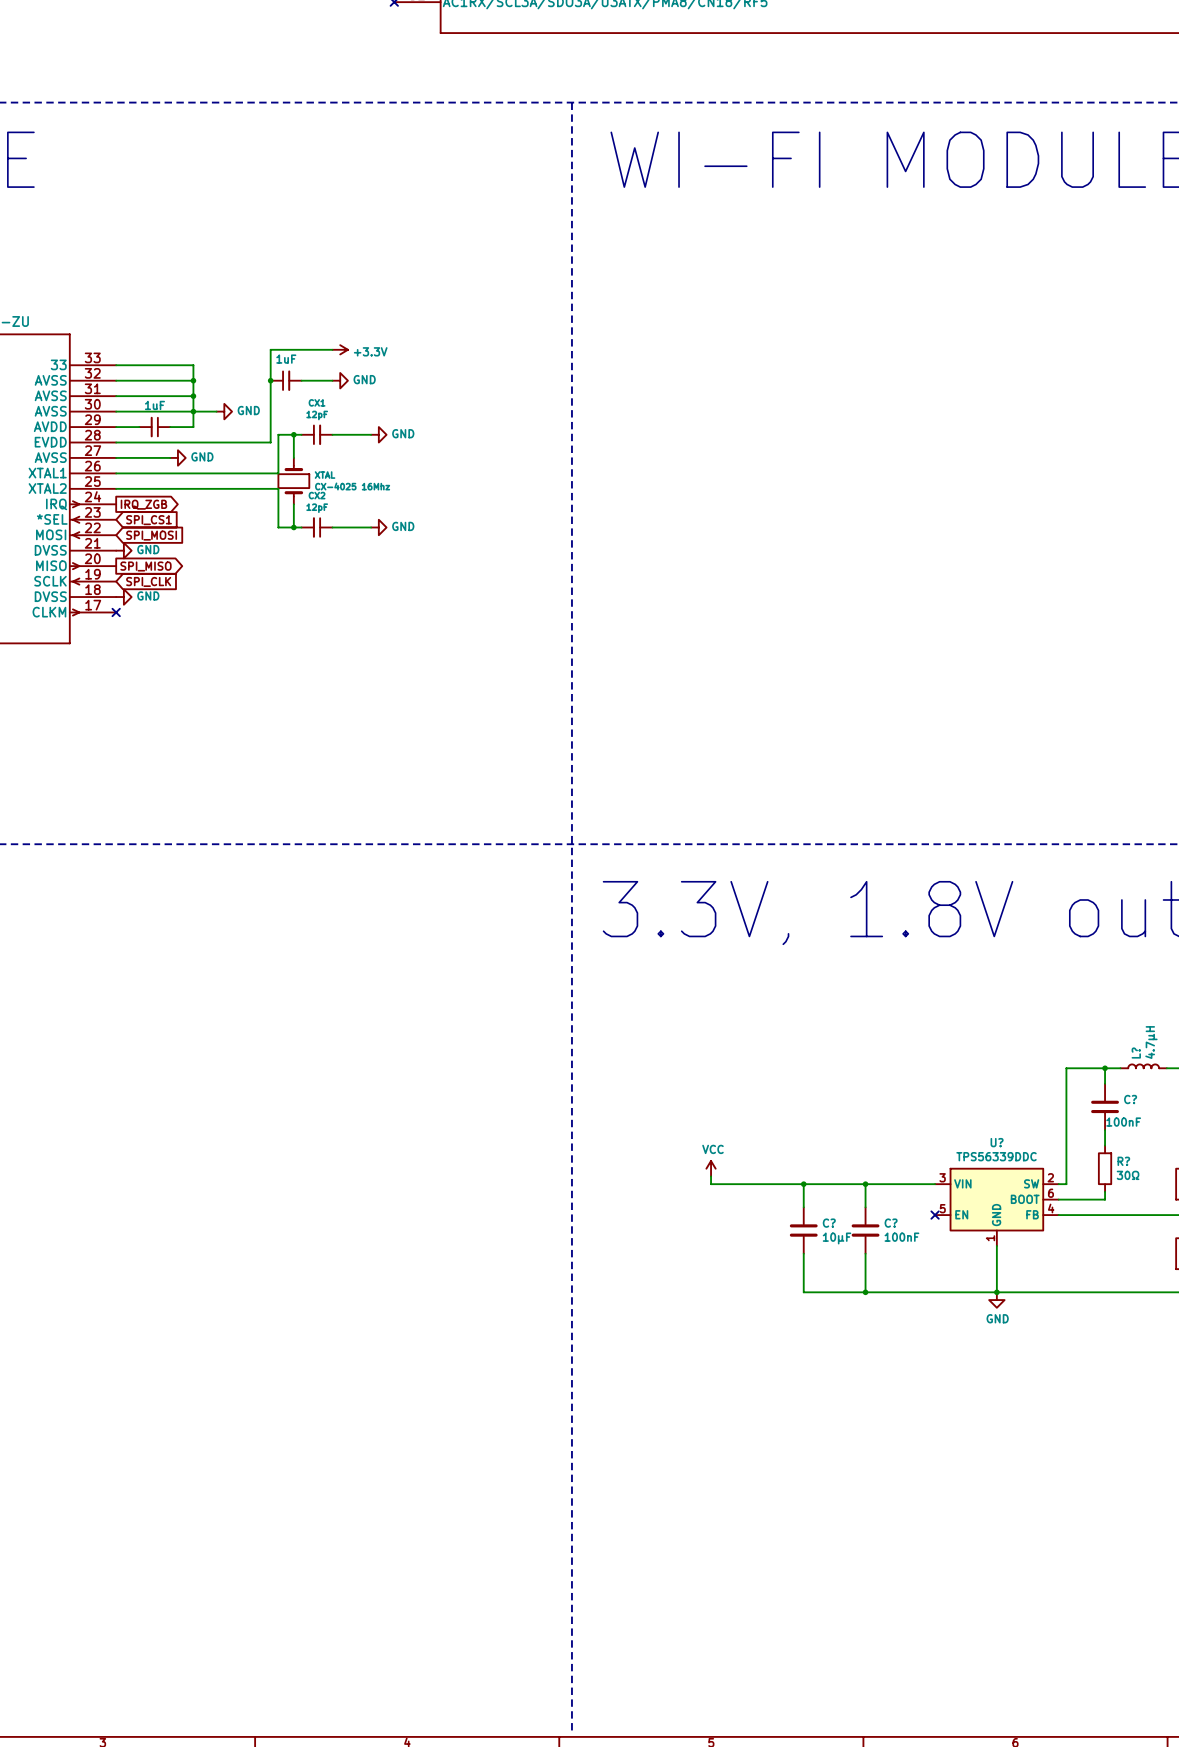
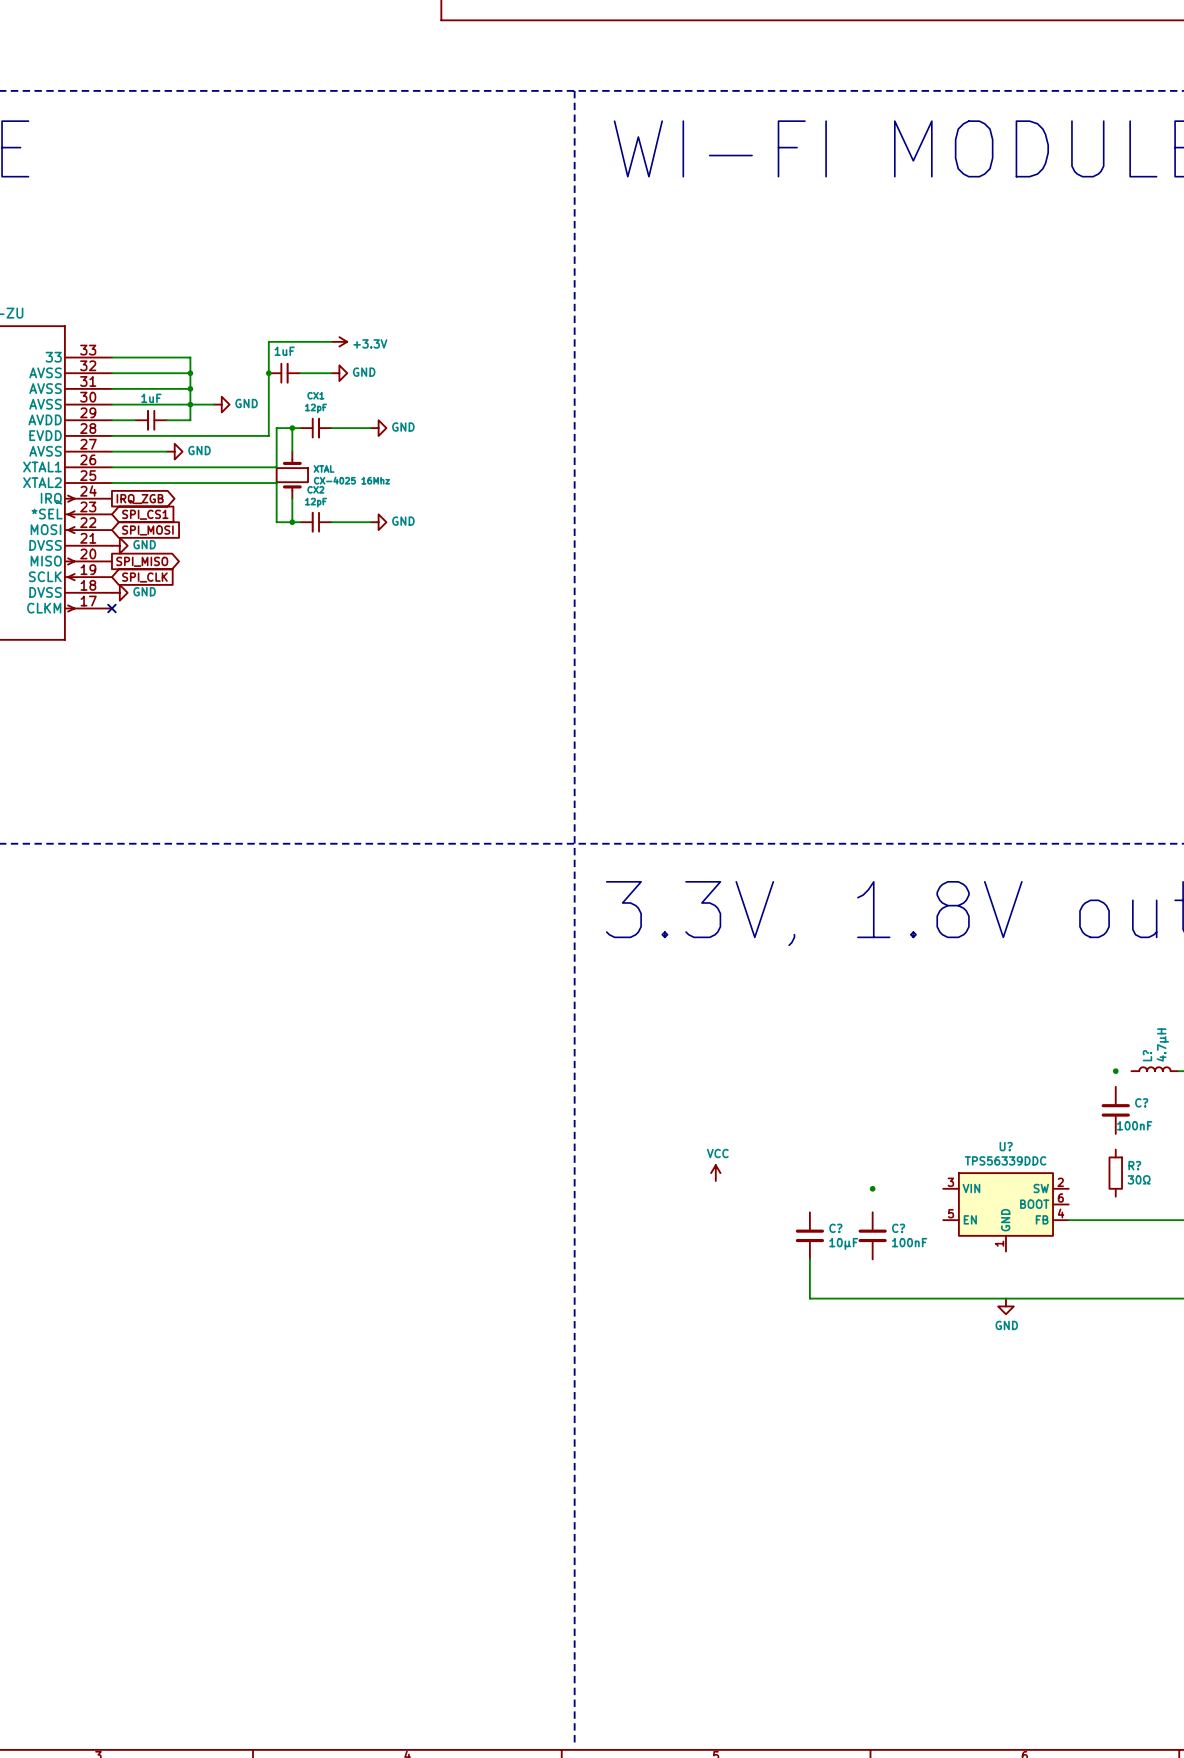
wire: (1105, 1068) (1105, 1083) -> none
wire: (1120, 1068) (1066, 1068) (1066, 1184) (1058, 1184) -> none
wire: (1105, 1130) (1105, 1145) -> none
wire: (711, 1176) (711, 1184) (935, 1184) -> none
wire: (803, 1184) (803, 1207) -> none
junction: (803, 1184) -> none
wire: (865, 1184) (865, 1207) -> none
wire: (1105, 1191) (1105, 1199) (1058, 1199) -> none
no-connect mark: (935, 1215) -> none
wire: (996, 1245) (996, 1292) -> none
wire: (865, 1253) (865, 1292) -> none
junction: (865, 1292) -> none
junction: (996, 1292) -> none

